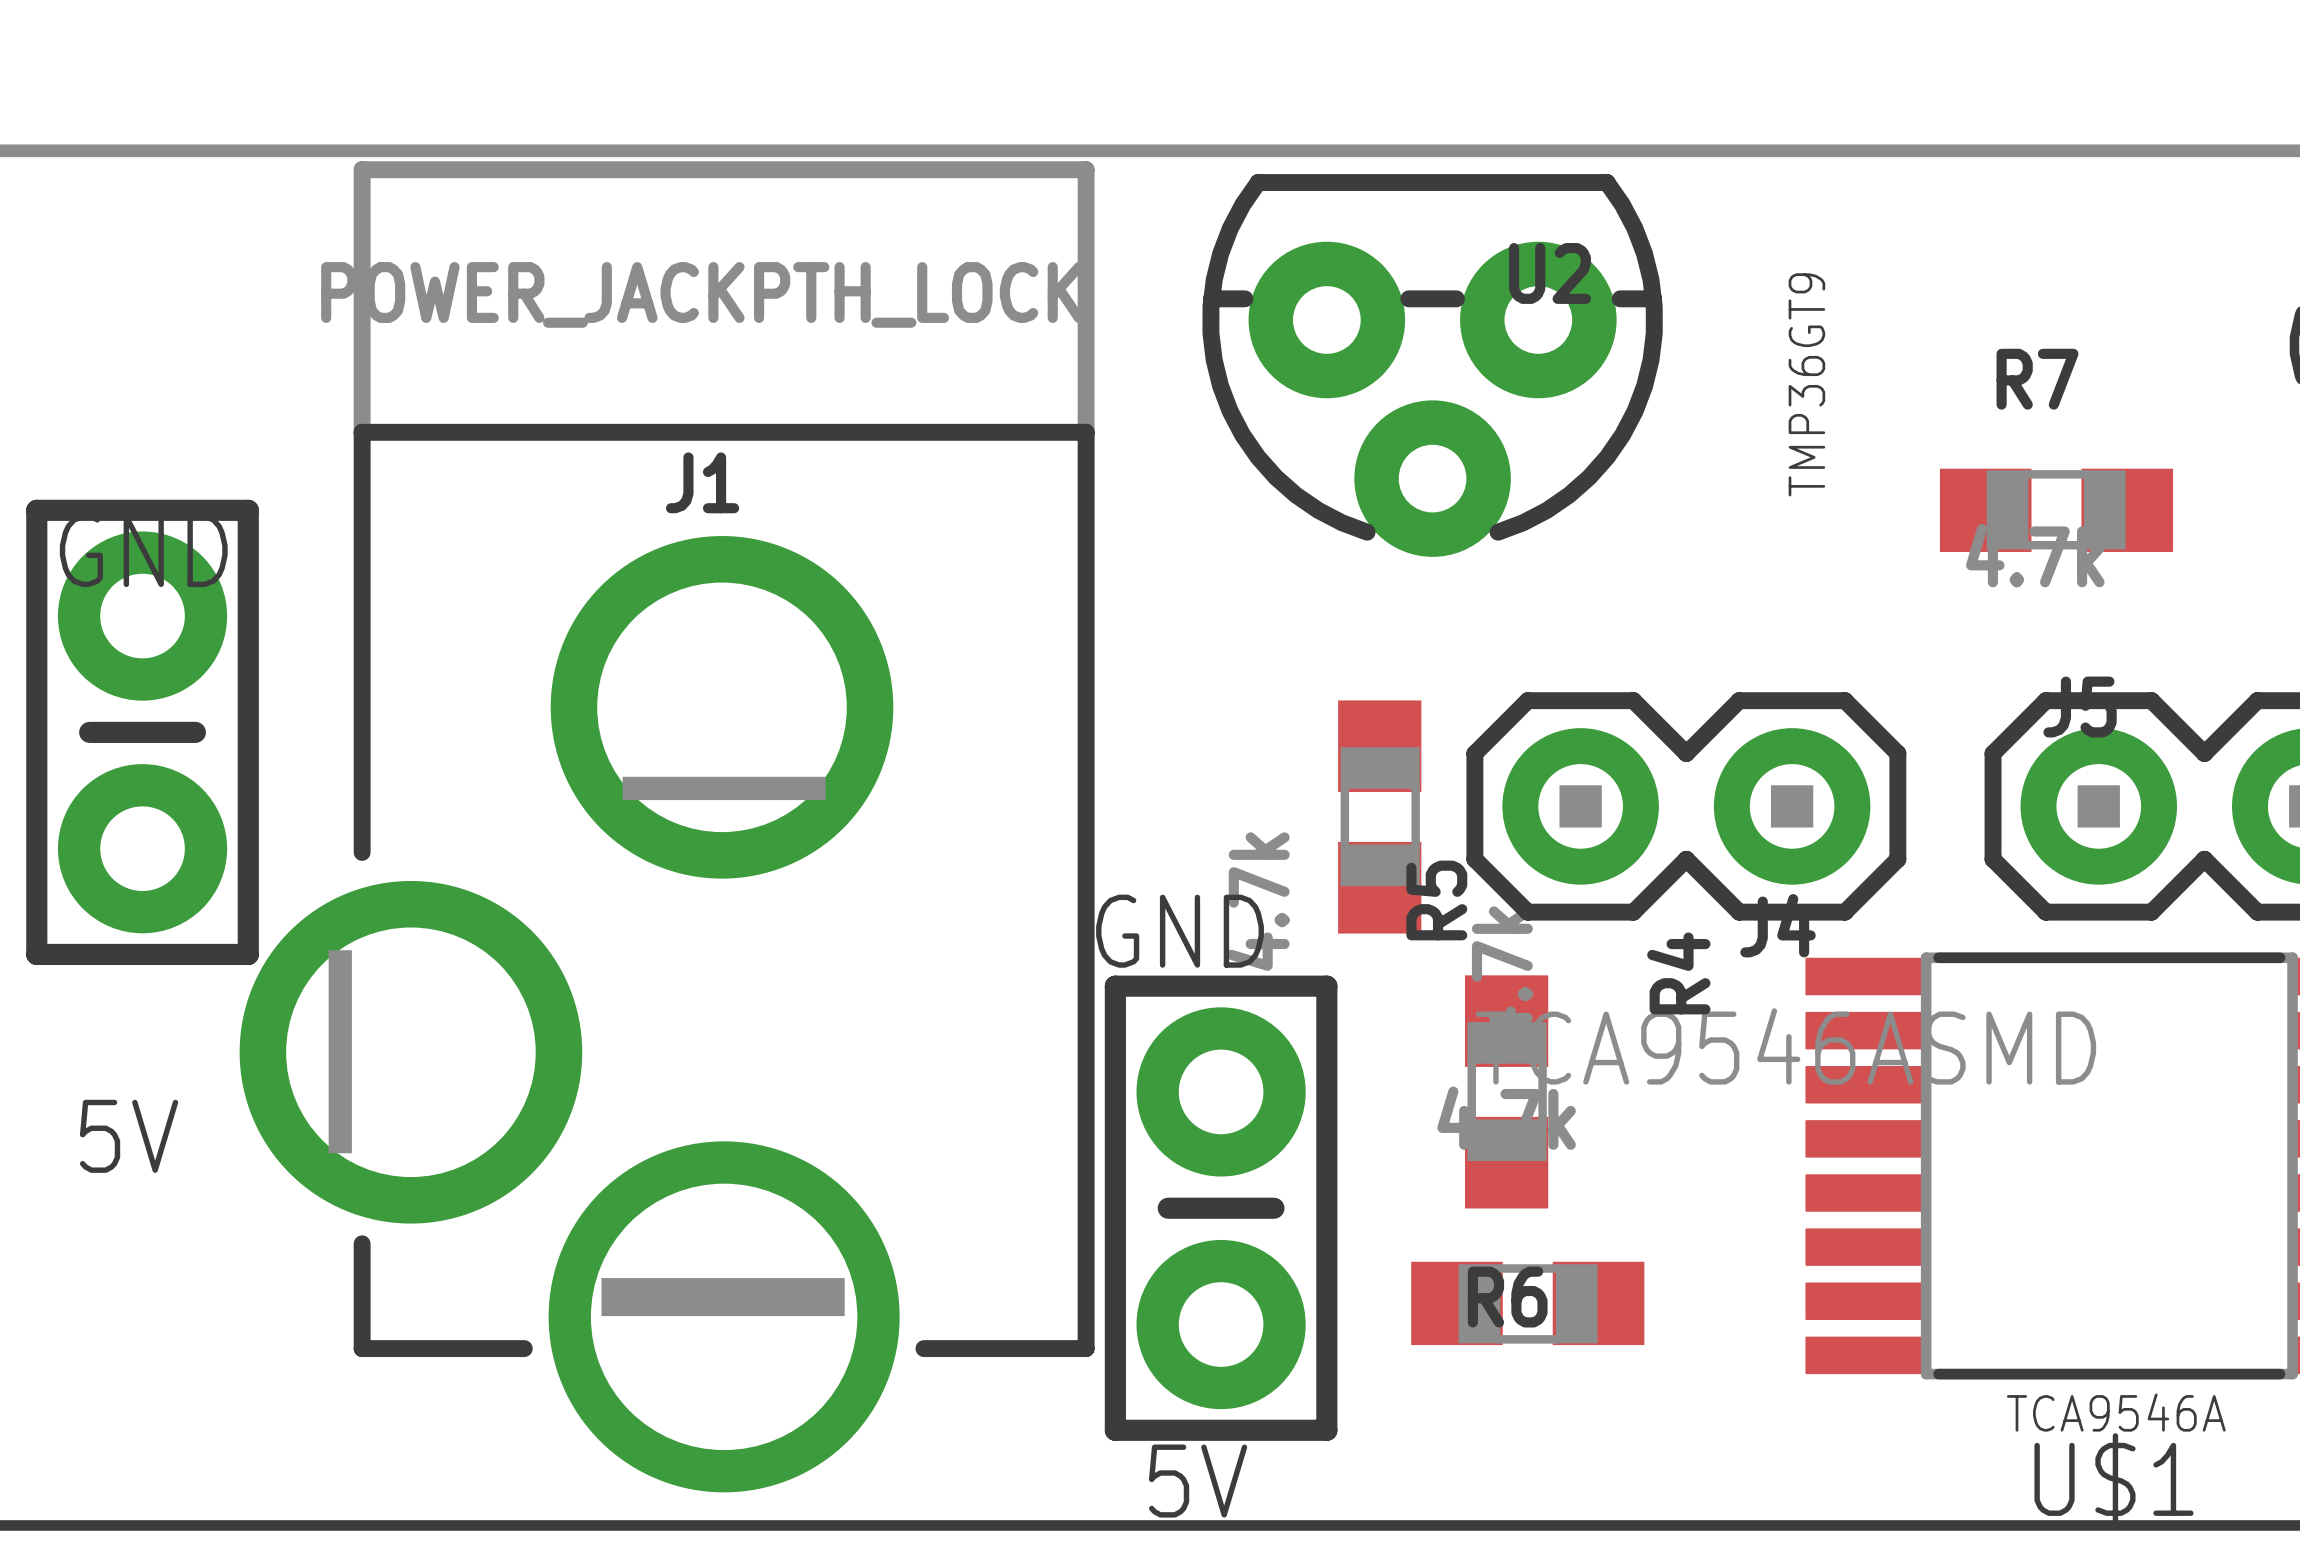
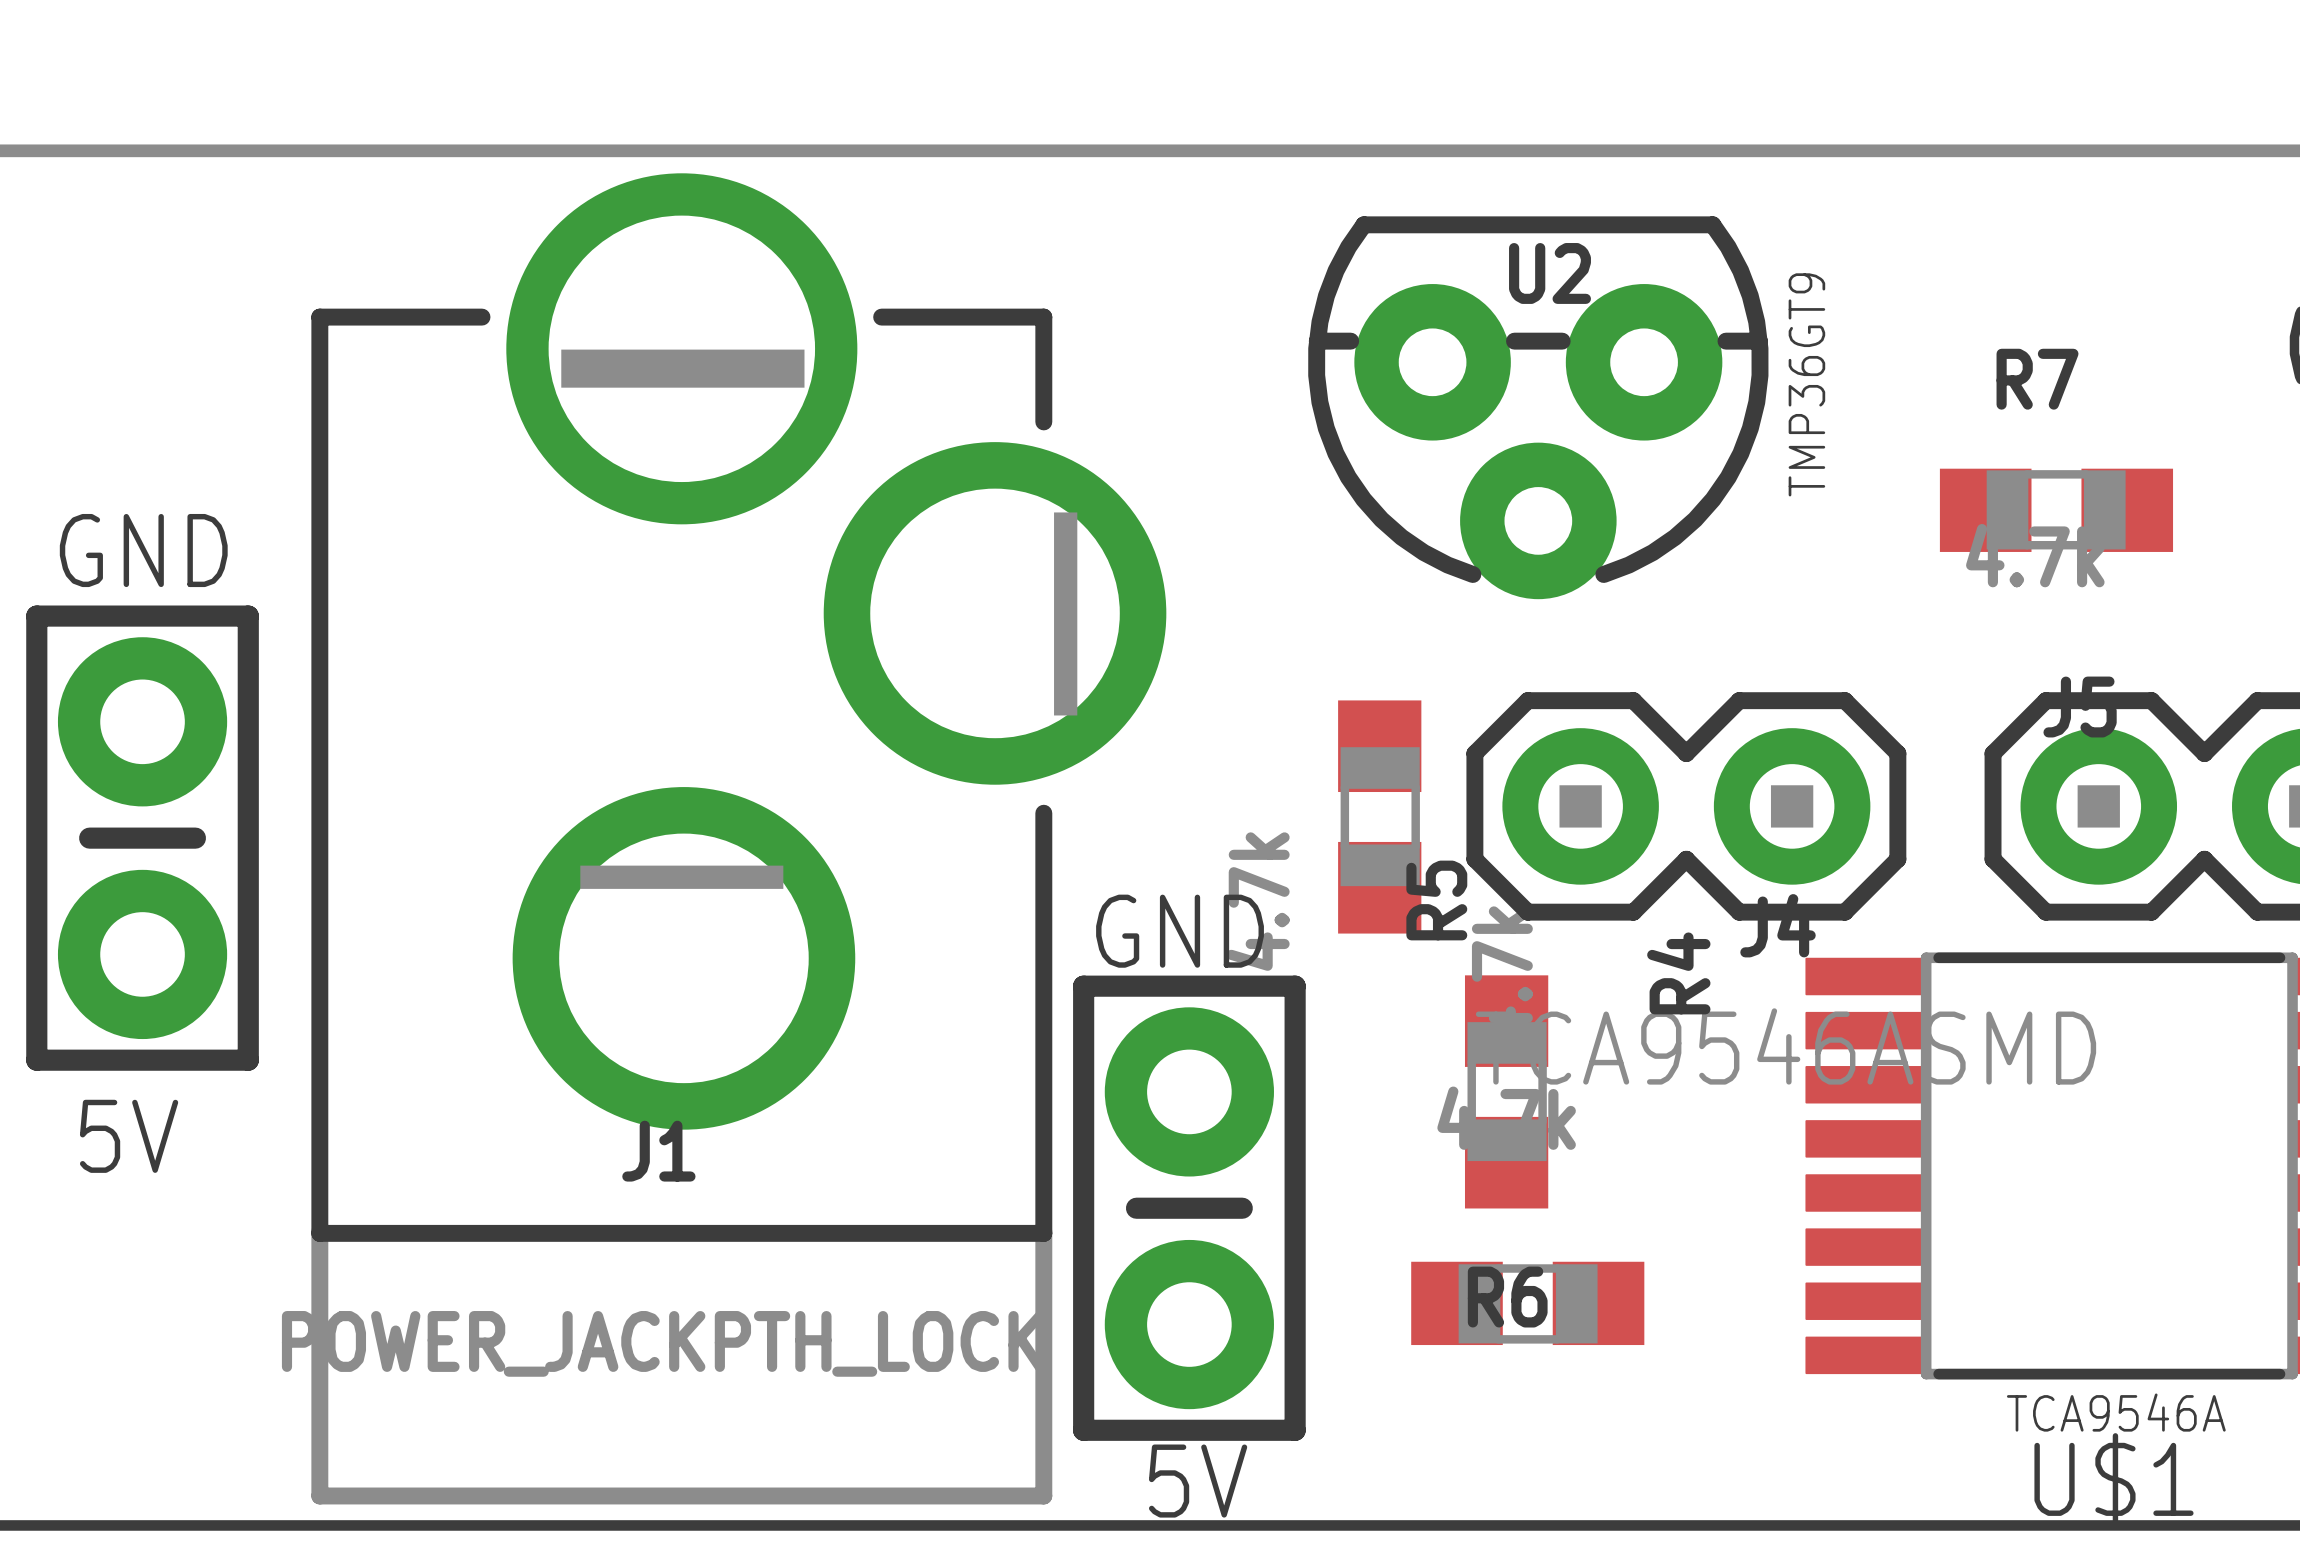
U2 position: (1432, 365) -> (1538, 407)
part position: (142, 732) -> (142, 838)
J1 rotation: 0° (667, 826) -> 180° (738, 838)
part position: (1221, 1208) -> (1189, 1208)

